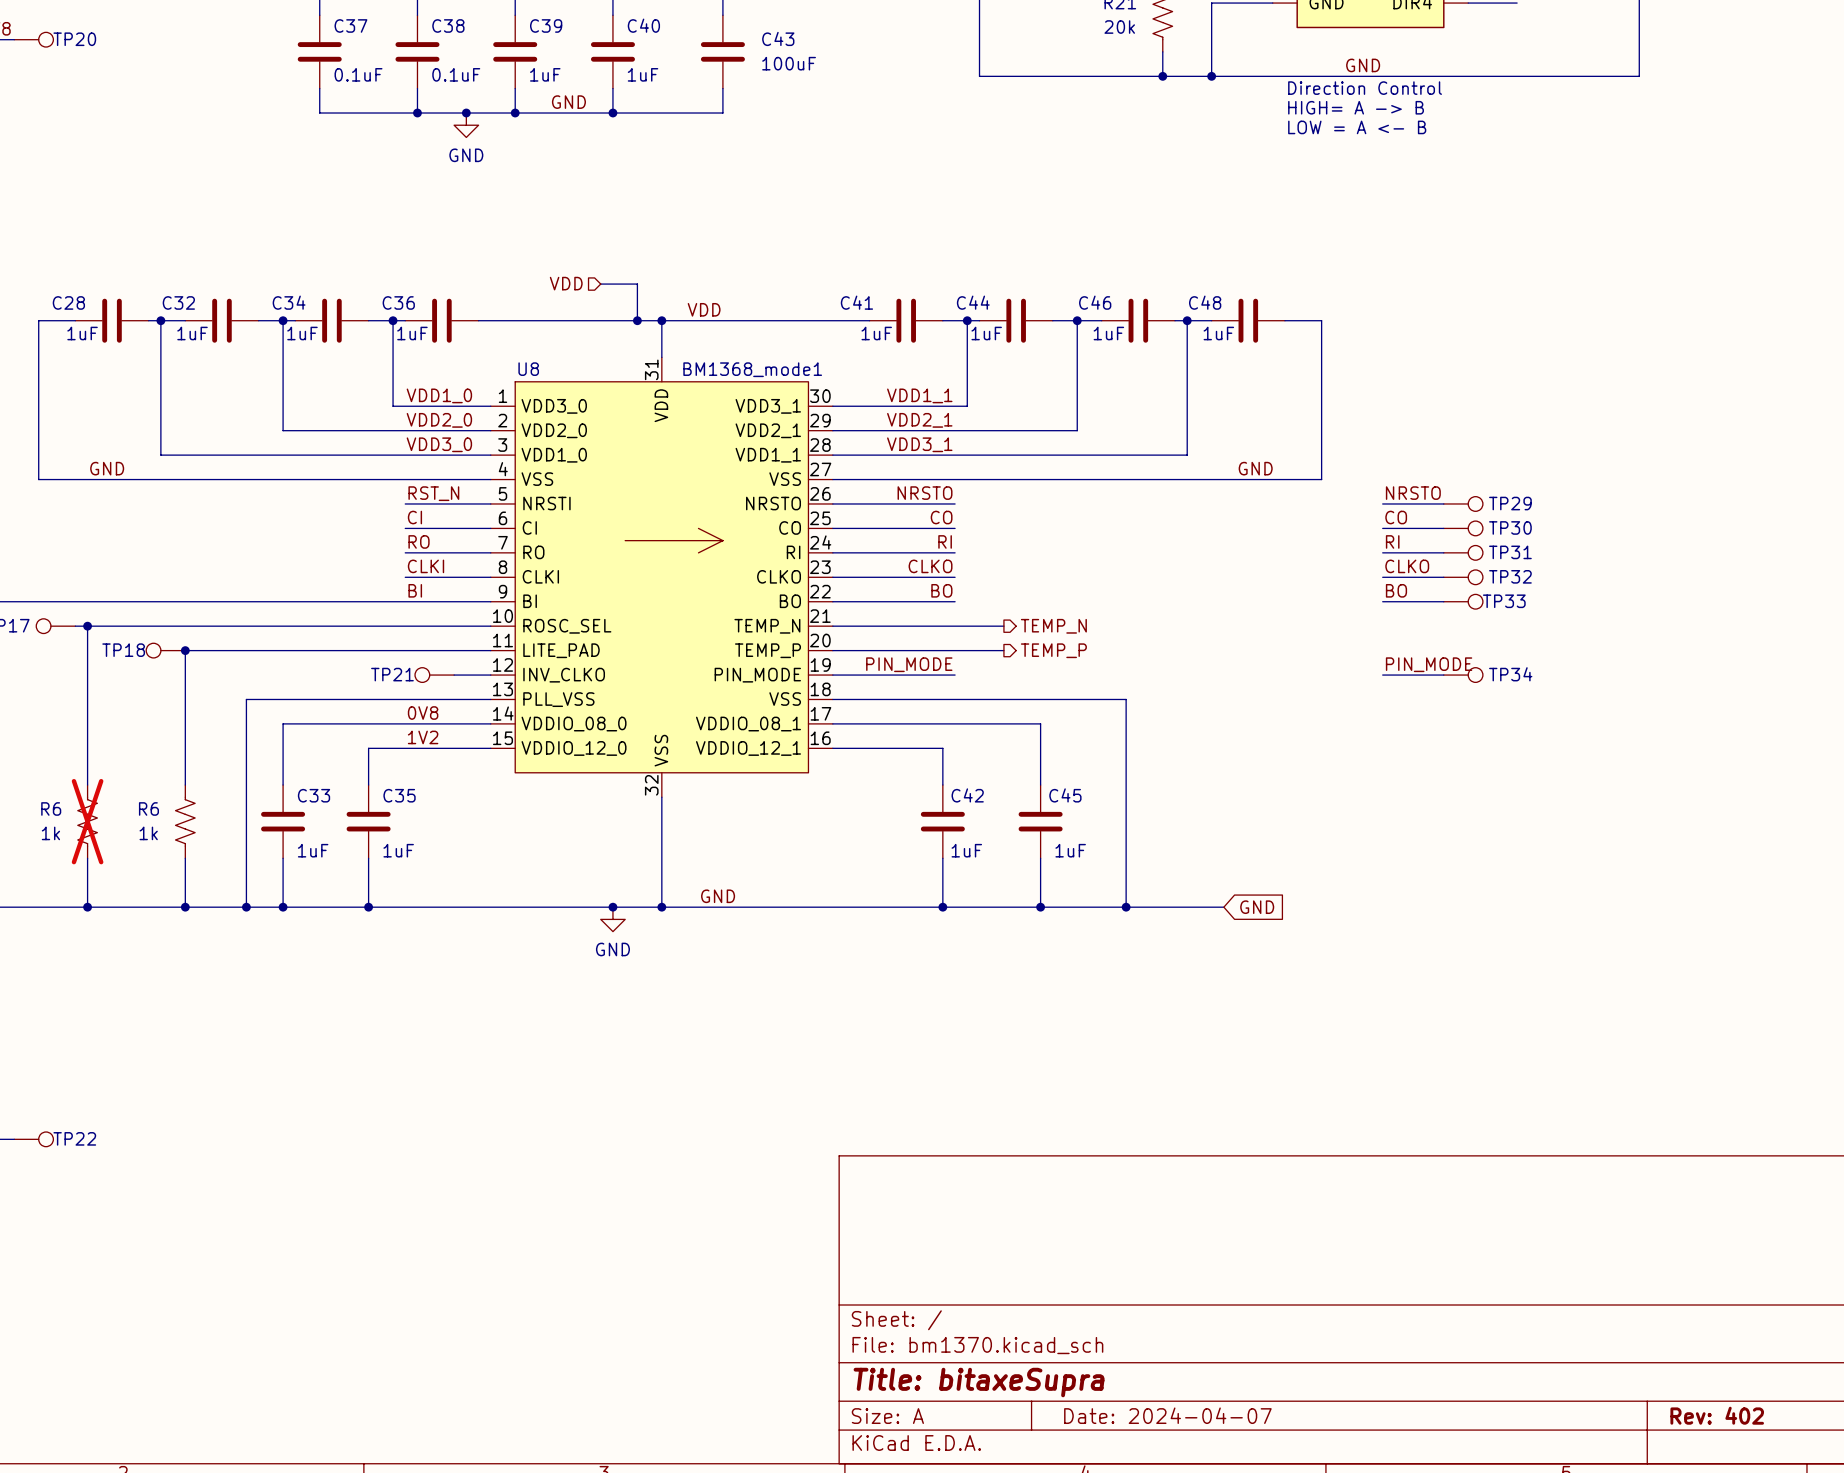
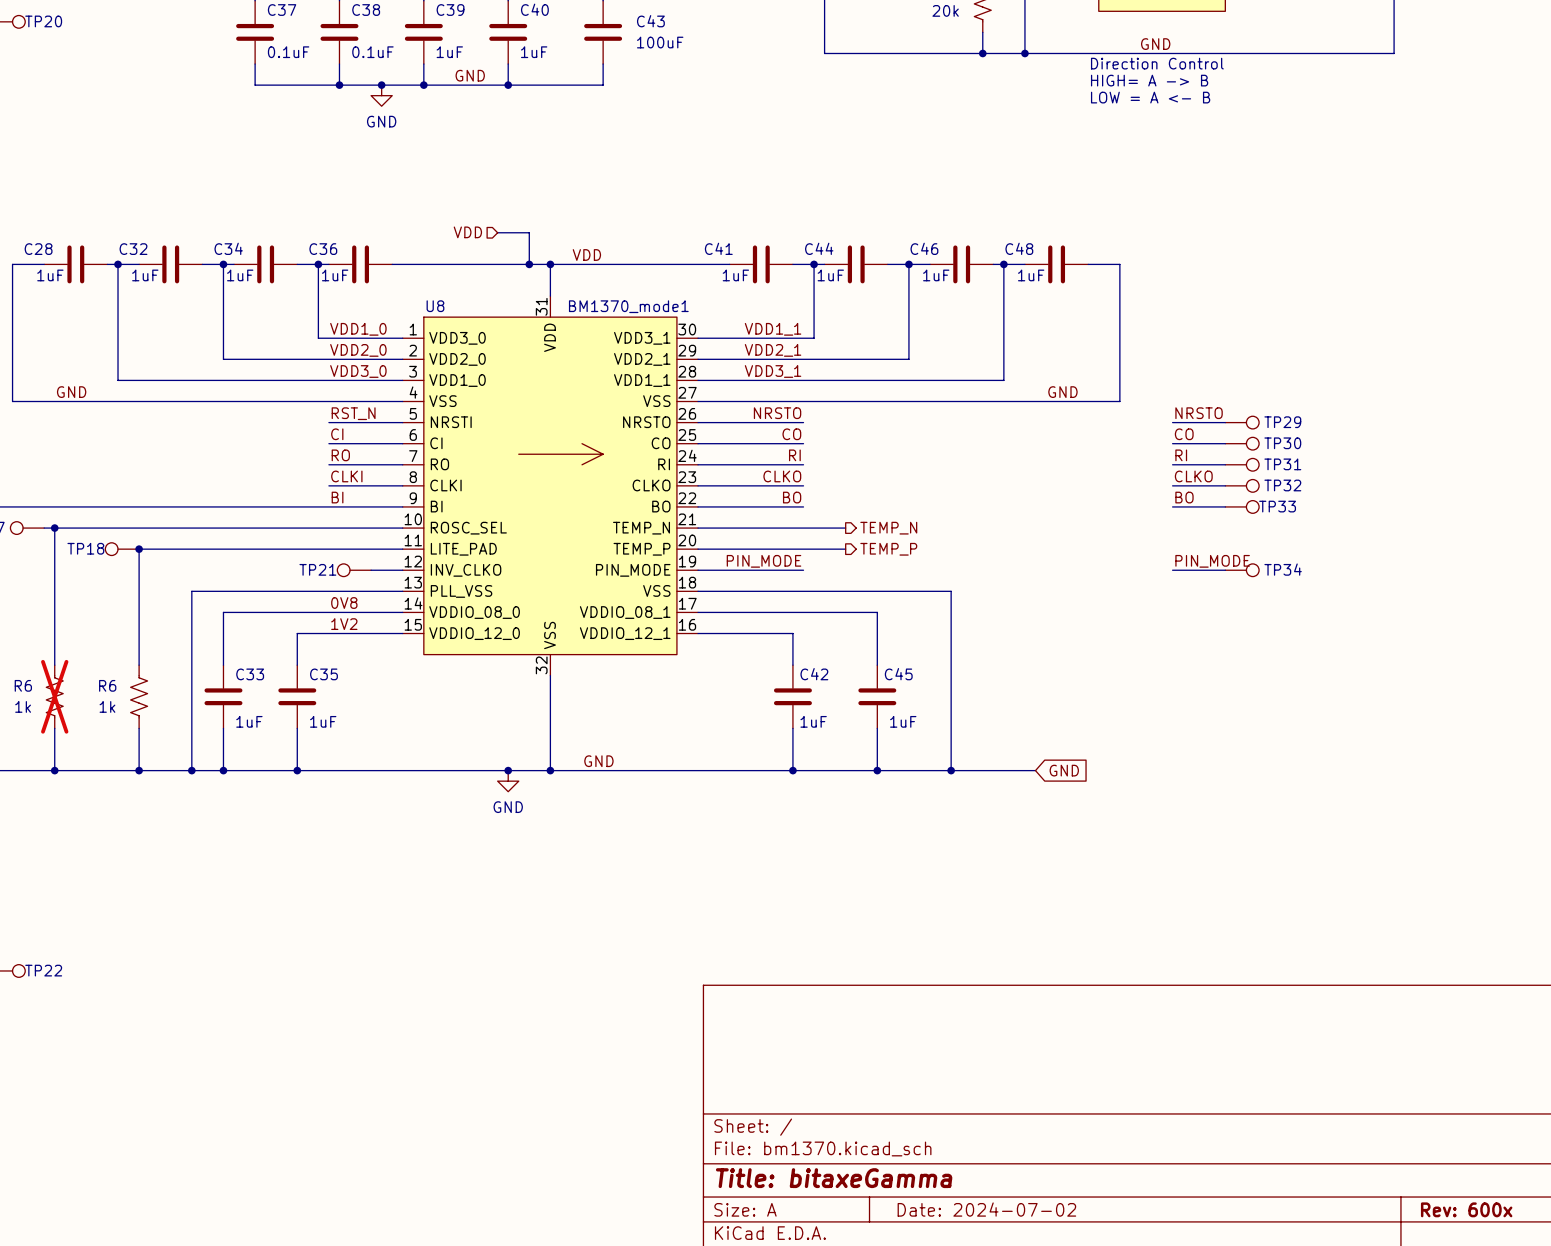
U8 value: BM1368_mode1 (752, 369) -> BM1370_mode1 (628, 306)
title block: Title: bitaxeSupra (979, 1382) -> Title: bitaxeGamma (834, 1178)
title block: Date: 2024-04-07 (1167, 1415) -> Date: 2024-07-02 (986, 1209)
title block: Rev: 402 (1717, 1415) -> Rev: 600x (1466, 1209)

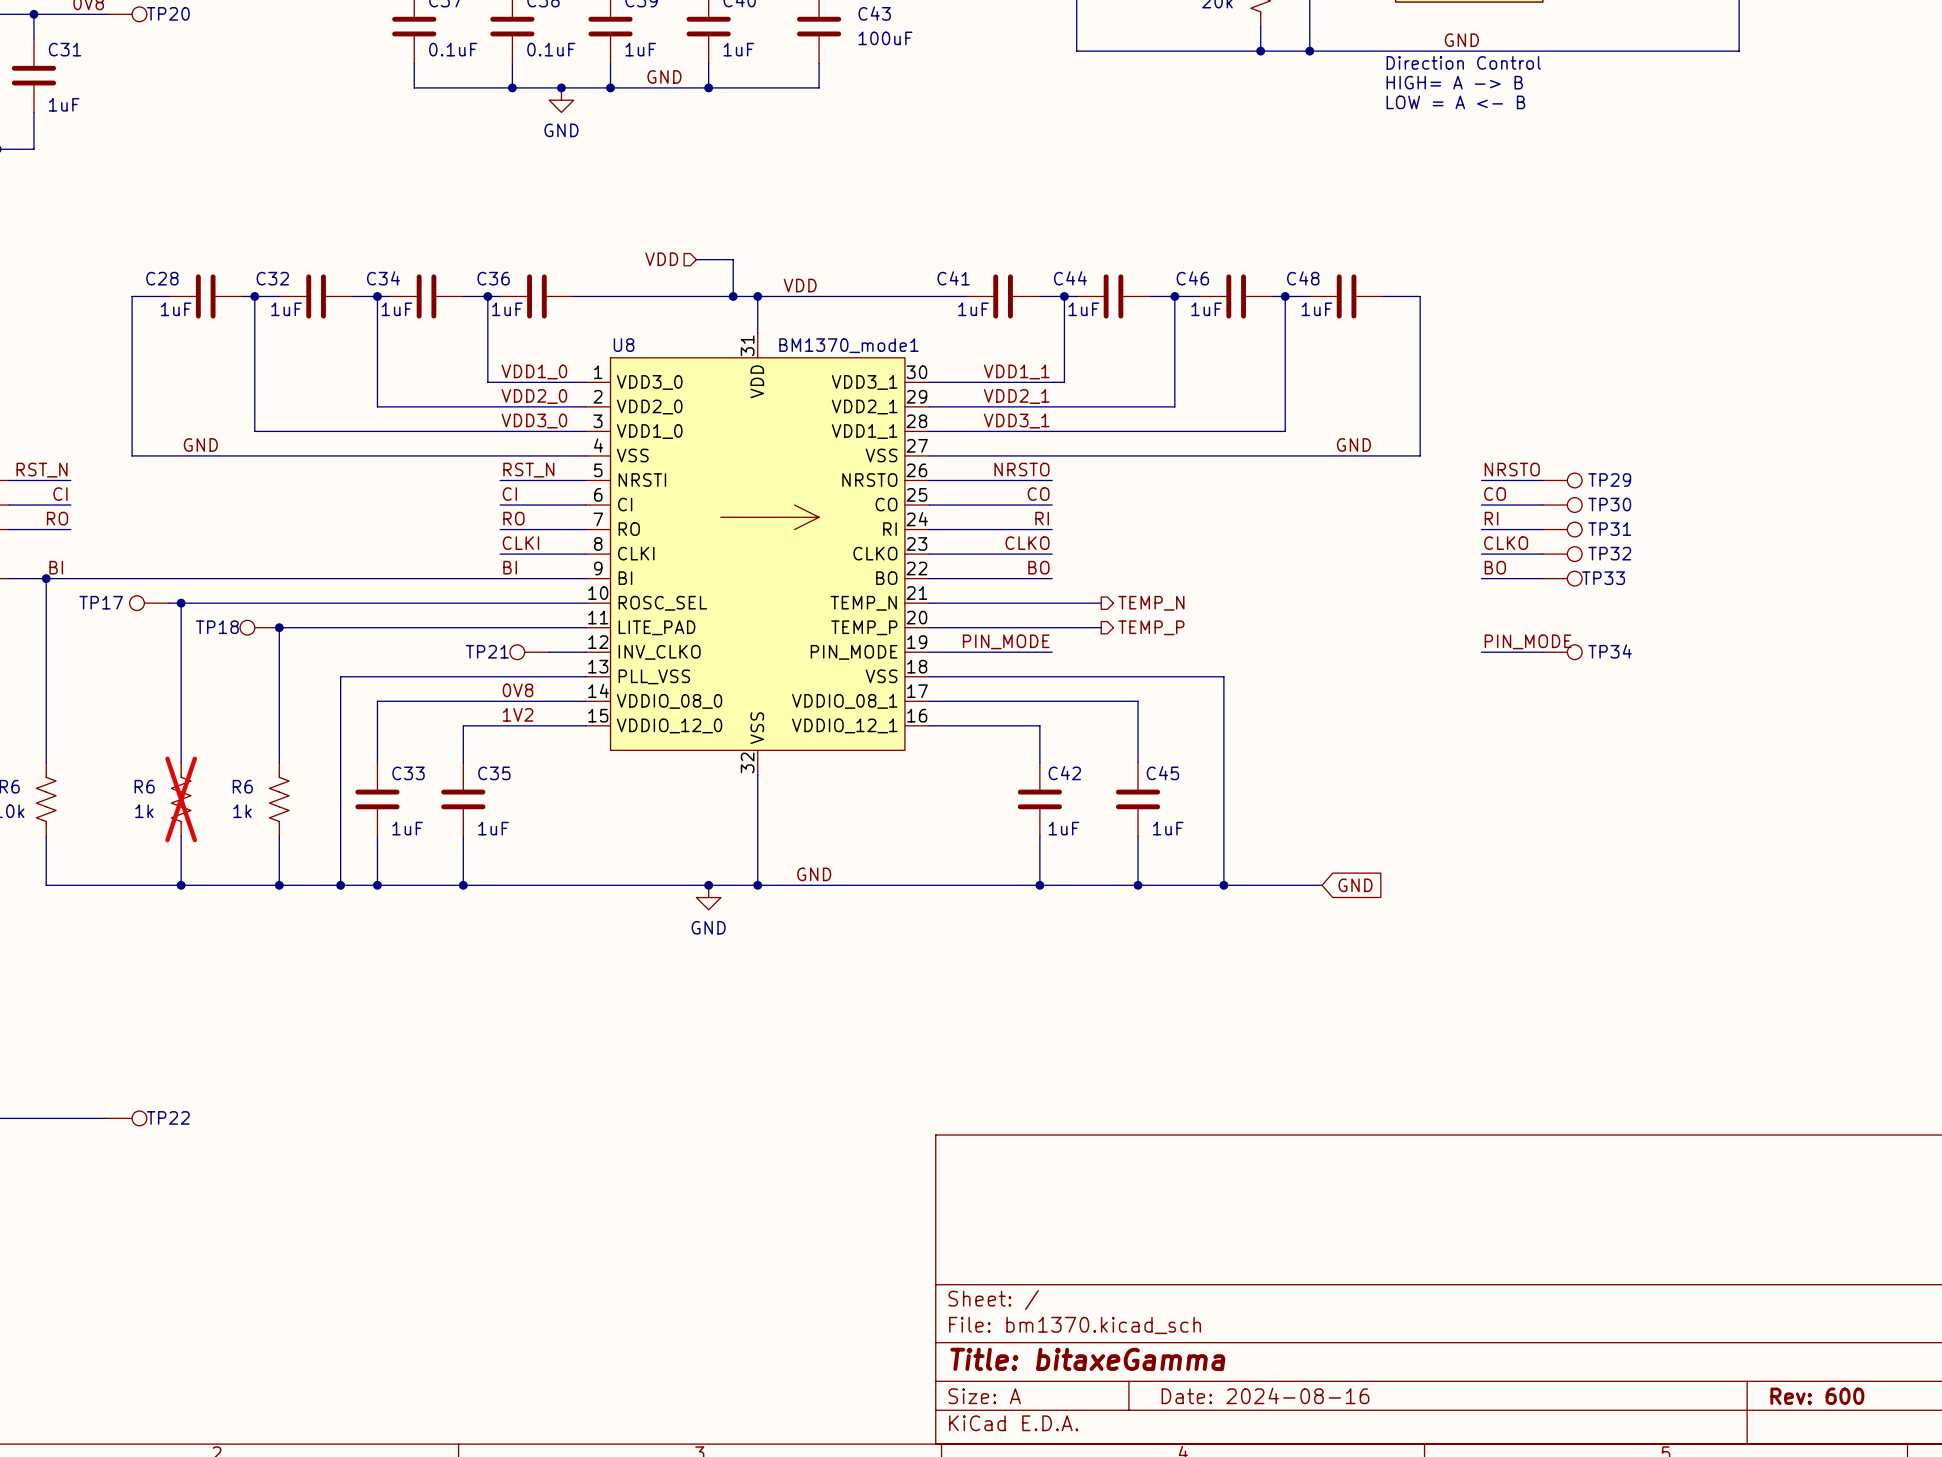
title block: Date: 2024-07-02 (986, 1209) -> Date: 2024-08-16 (1265, 1395)
title block: Rev: 600x (1466, 1209) -> Rev: 600 (1817, 1396)

